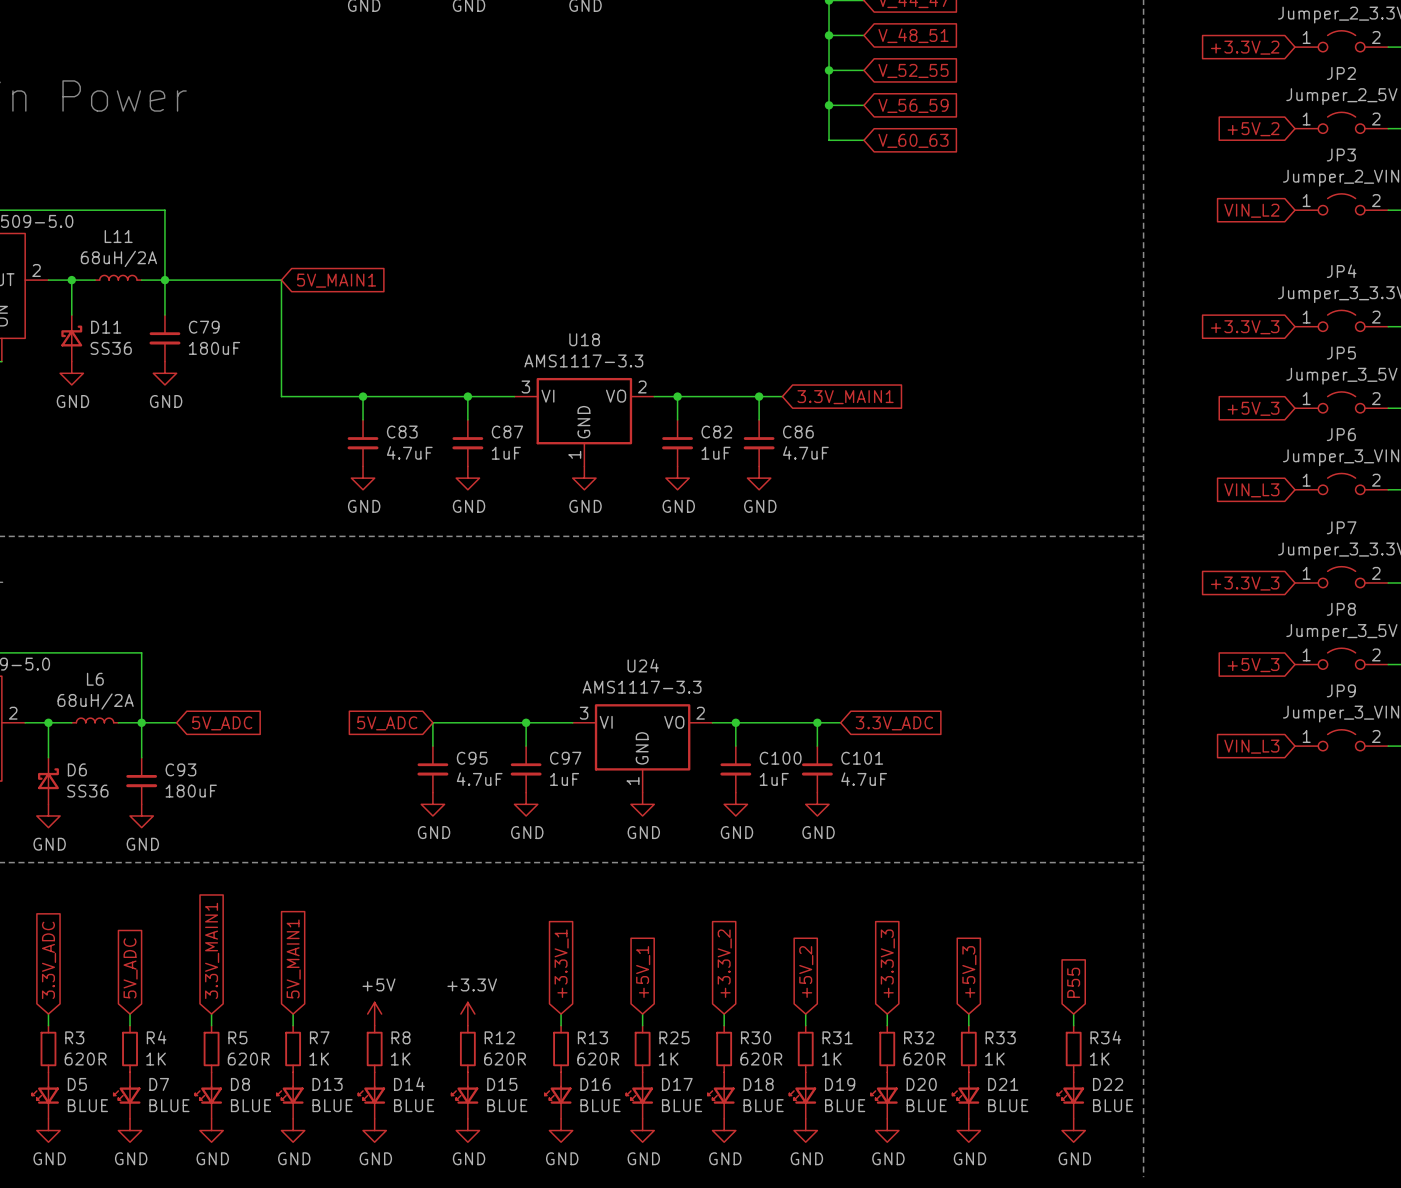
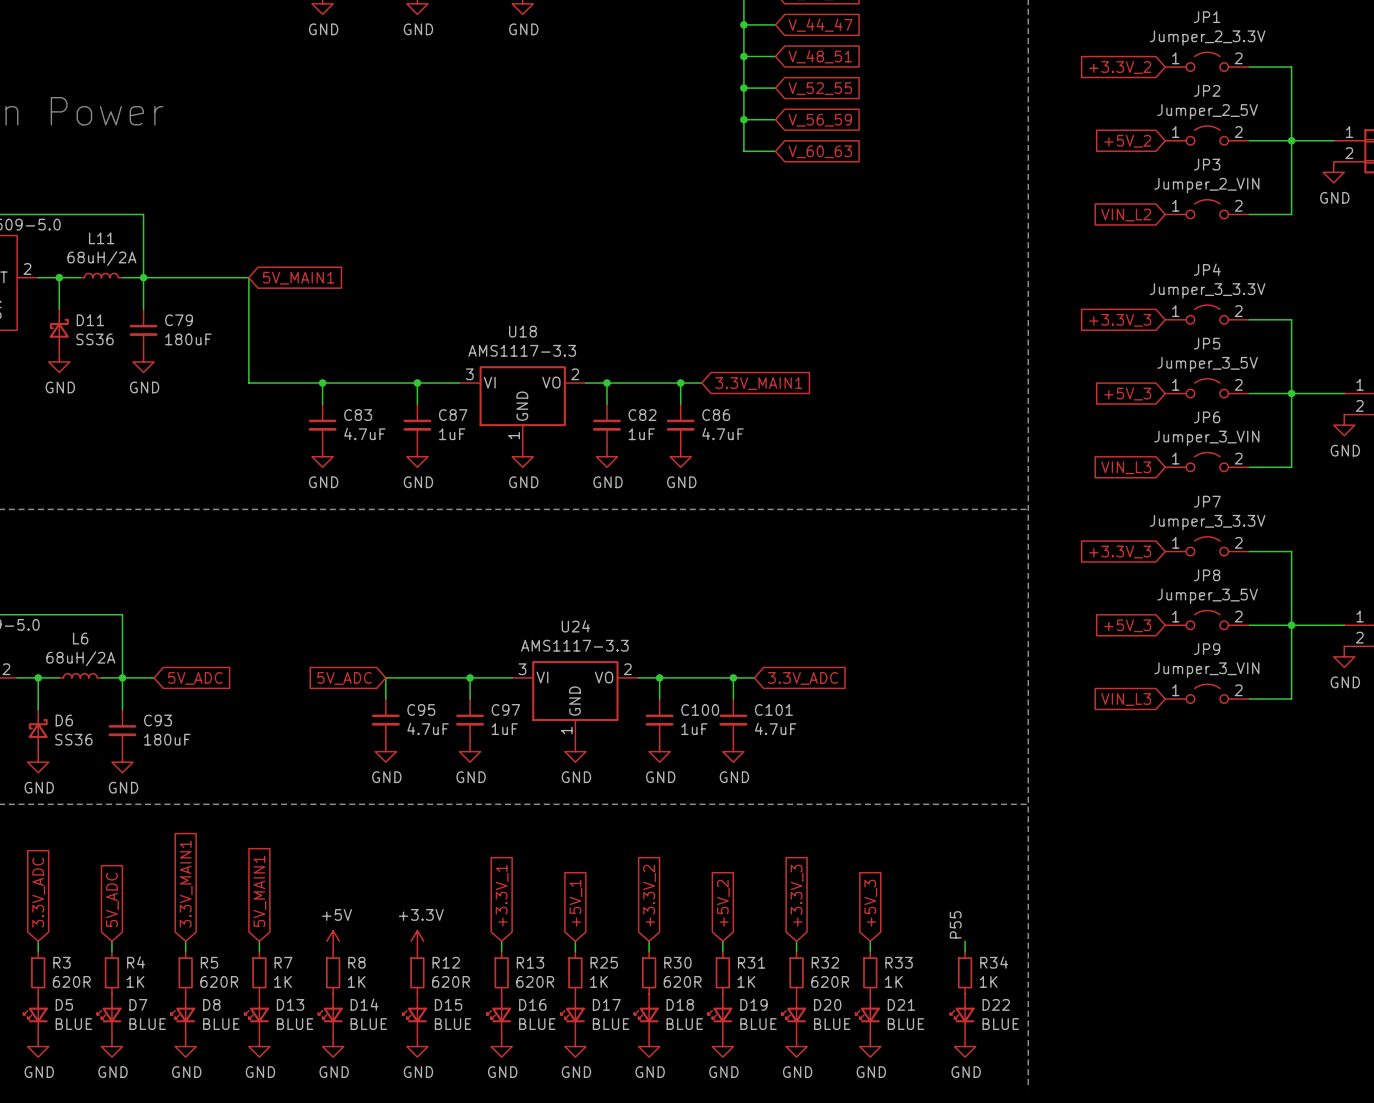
global label: P55 (1073, 982) -> none
label: none -> P55 (955, 924)

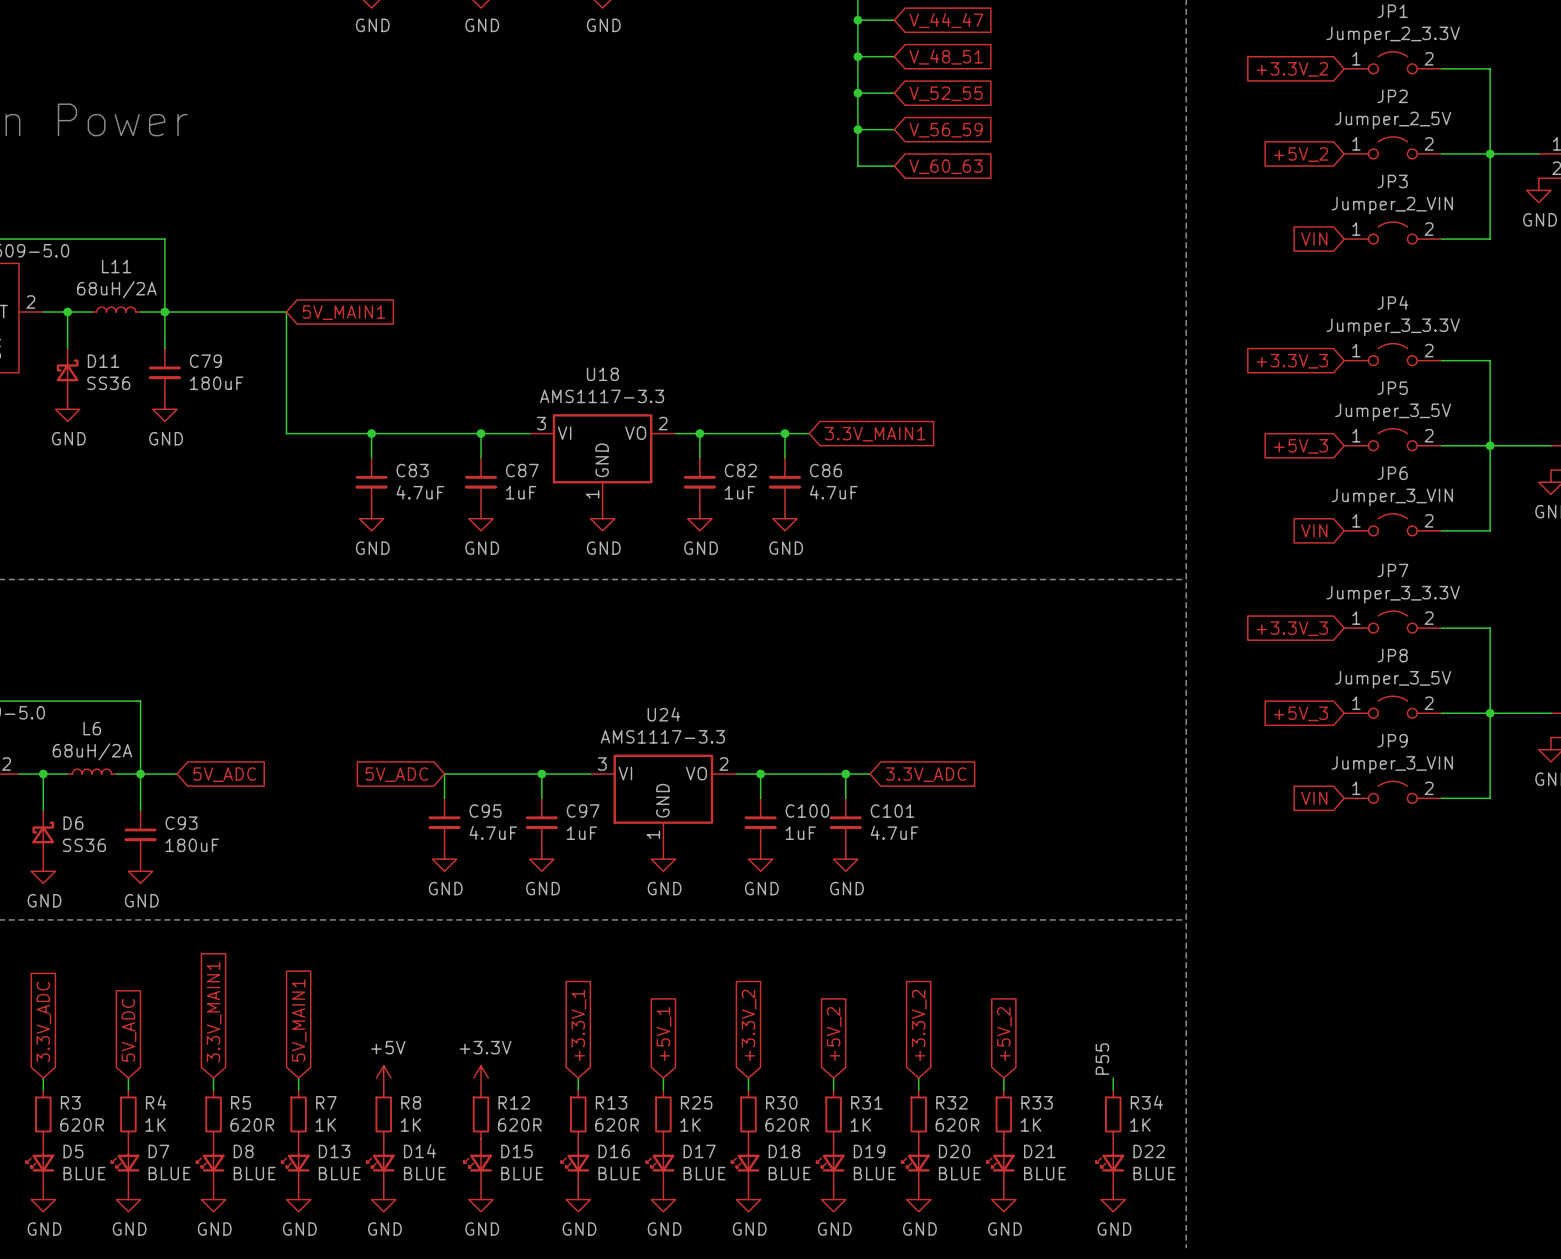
global label: VIN_L2 (1126, 214) -> VIN (1314, 239)
global label: VIN_L3 (1126, 467) -> VIN (1314, 530)
global label: VIN_L3 (1126, 699) -> VIN (1314, 798)
global label: +3.3V_3 (797, 895) -> +3.3V_2 (919, 1025)
global label: +5V_3 (870, 903) -> +5V_2 (1004, 1034)

